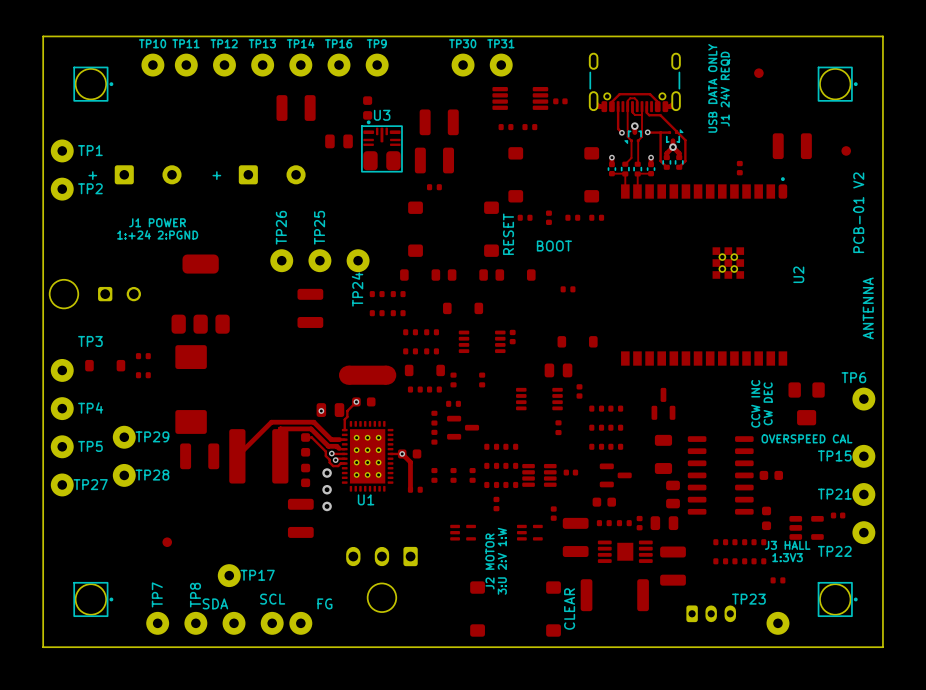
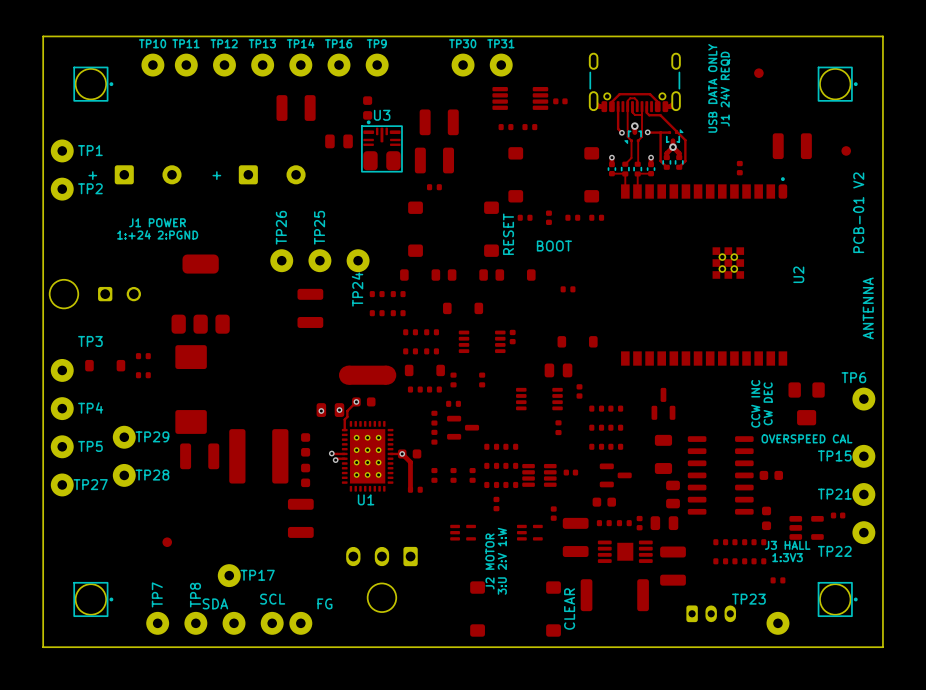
via: none -> (339, 410)
track: (305, 437) (311, 437) (325, 451) (325, 455) (333, 466) (344, 463) -> none
track: (344, 439) (331, 439) (313, 422) (271, 422) (237, 456) -> none
track: (344, 449) (328, 446) (311, 428) (280, 428) (280, 456) -> none
via: (327, 473) -> none
via: (327, 489) -> none
via: (327, 506) -> none

